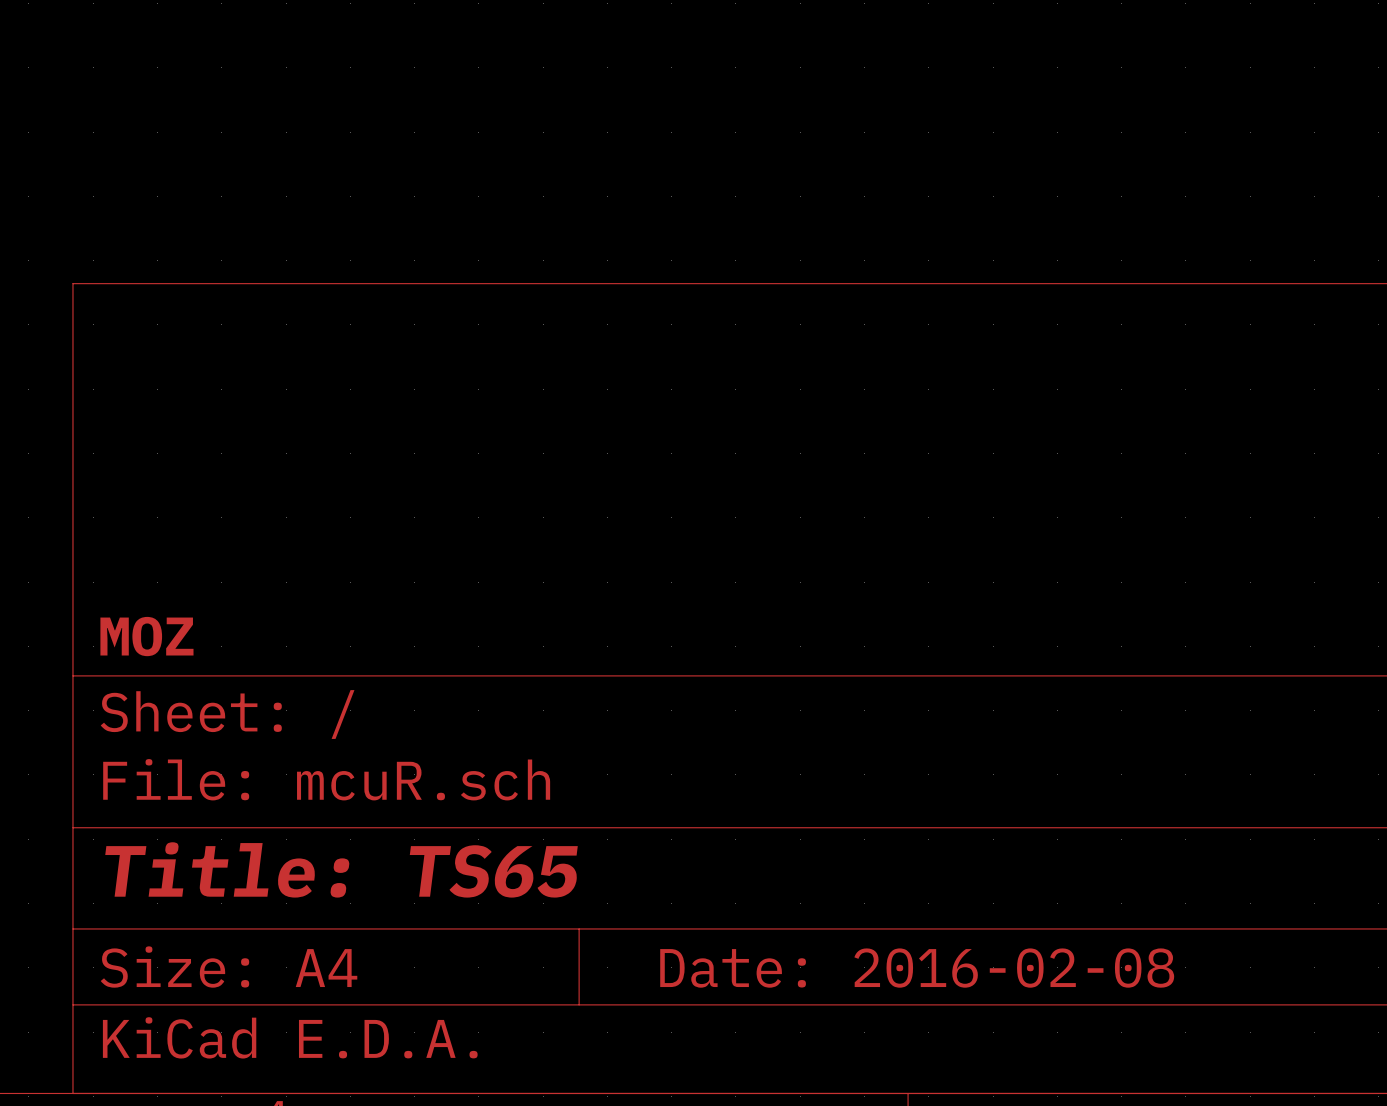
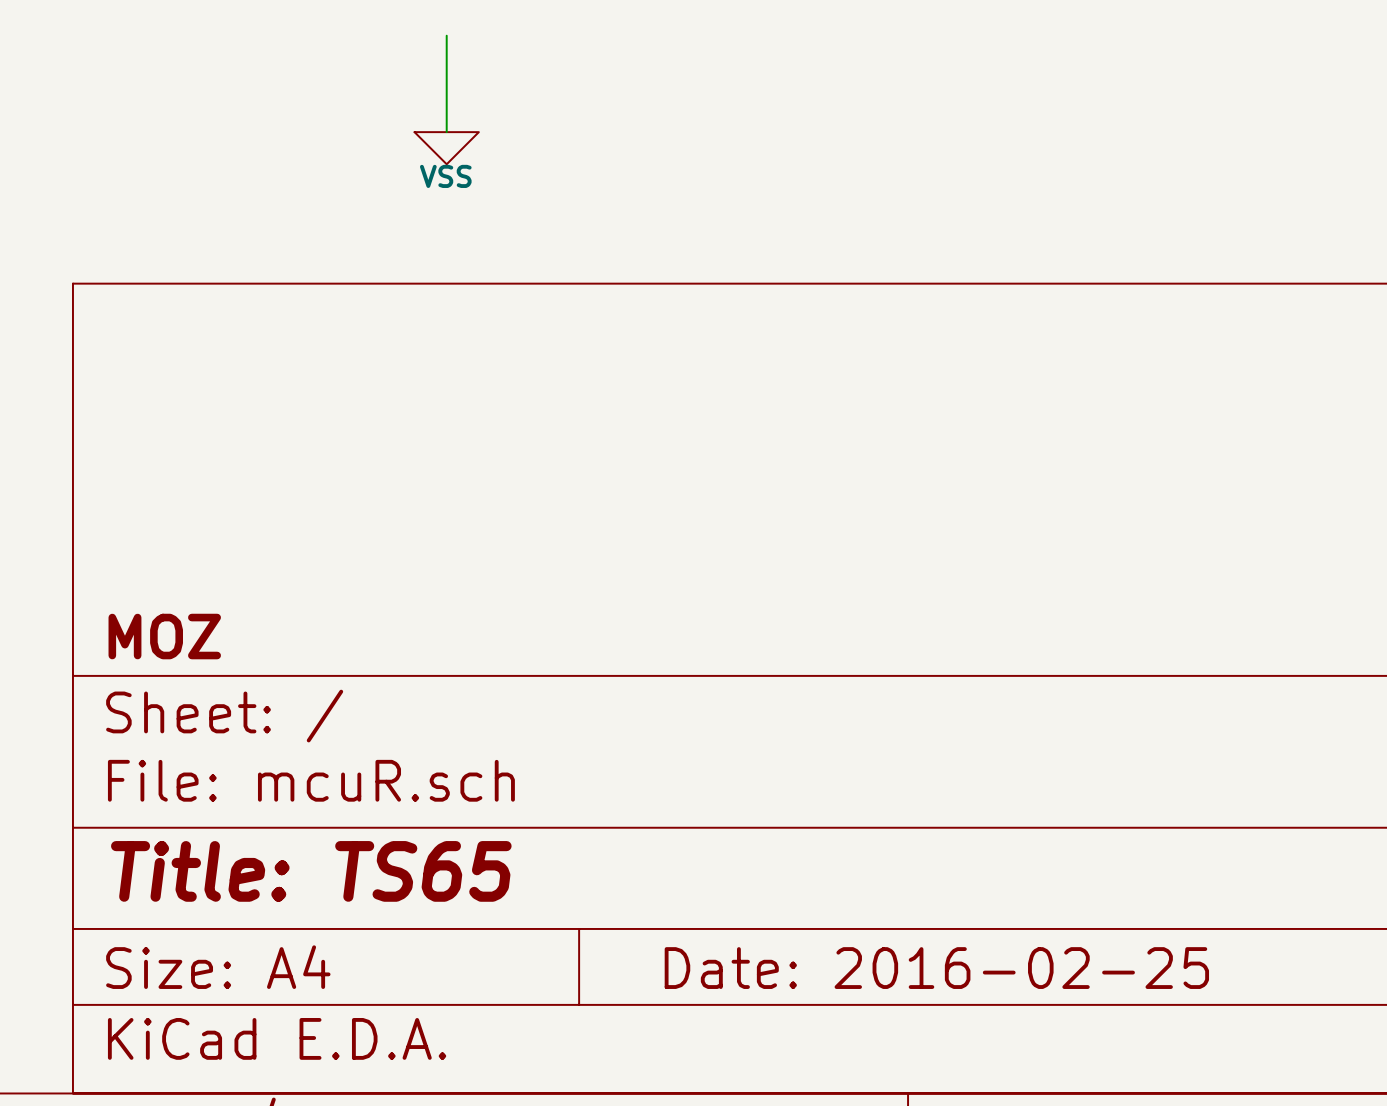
wire: none -> (446, 35) (446, 132)
power symbol: none -> VSS (446, 148)
title block: Date: 2016-02-08 (917, 968) -> Date: 2016-02-25 (936, 968)

